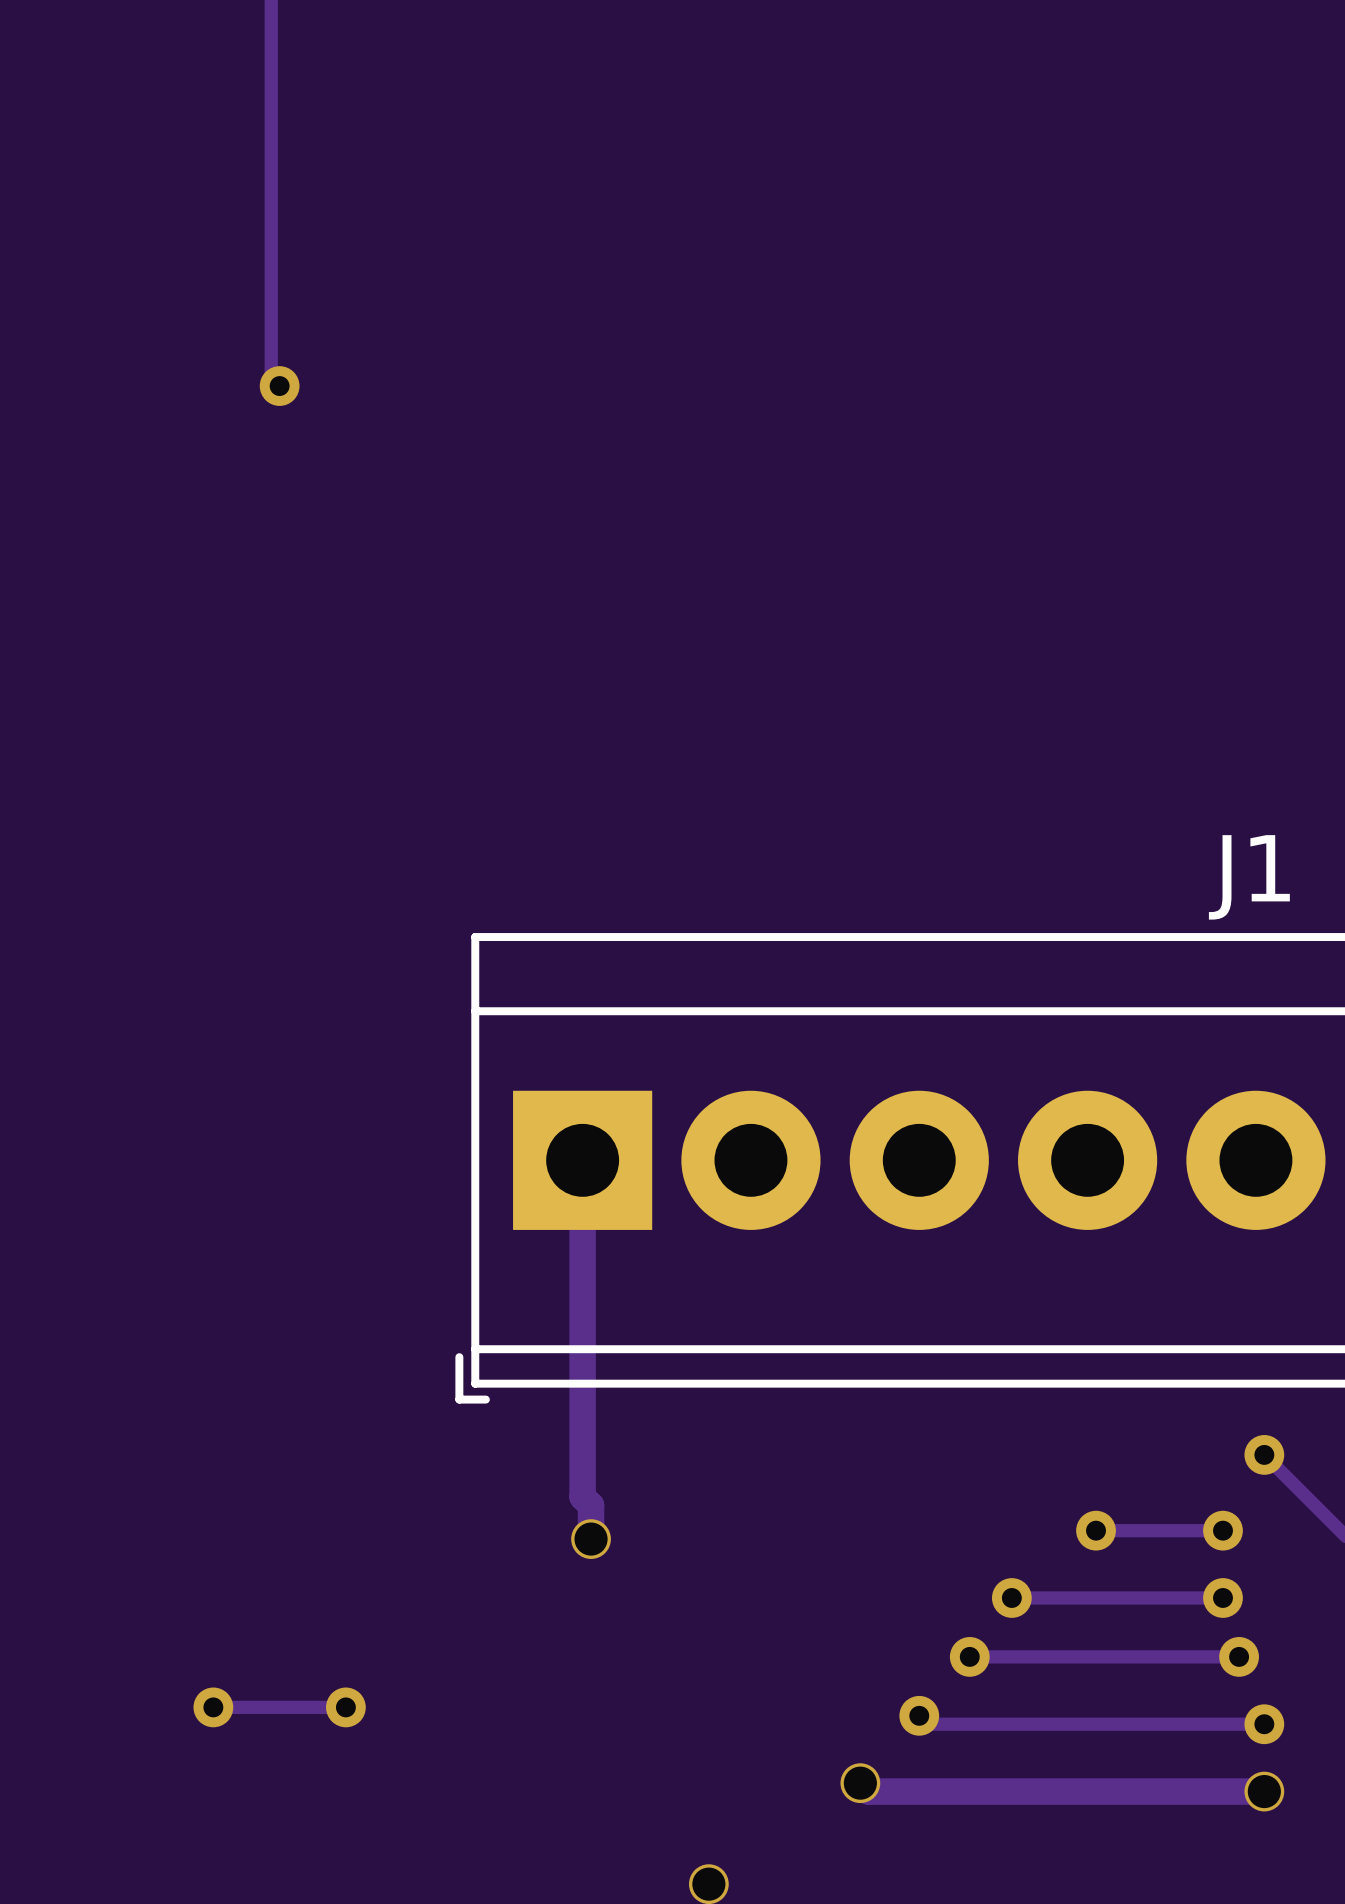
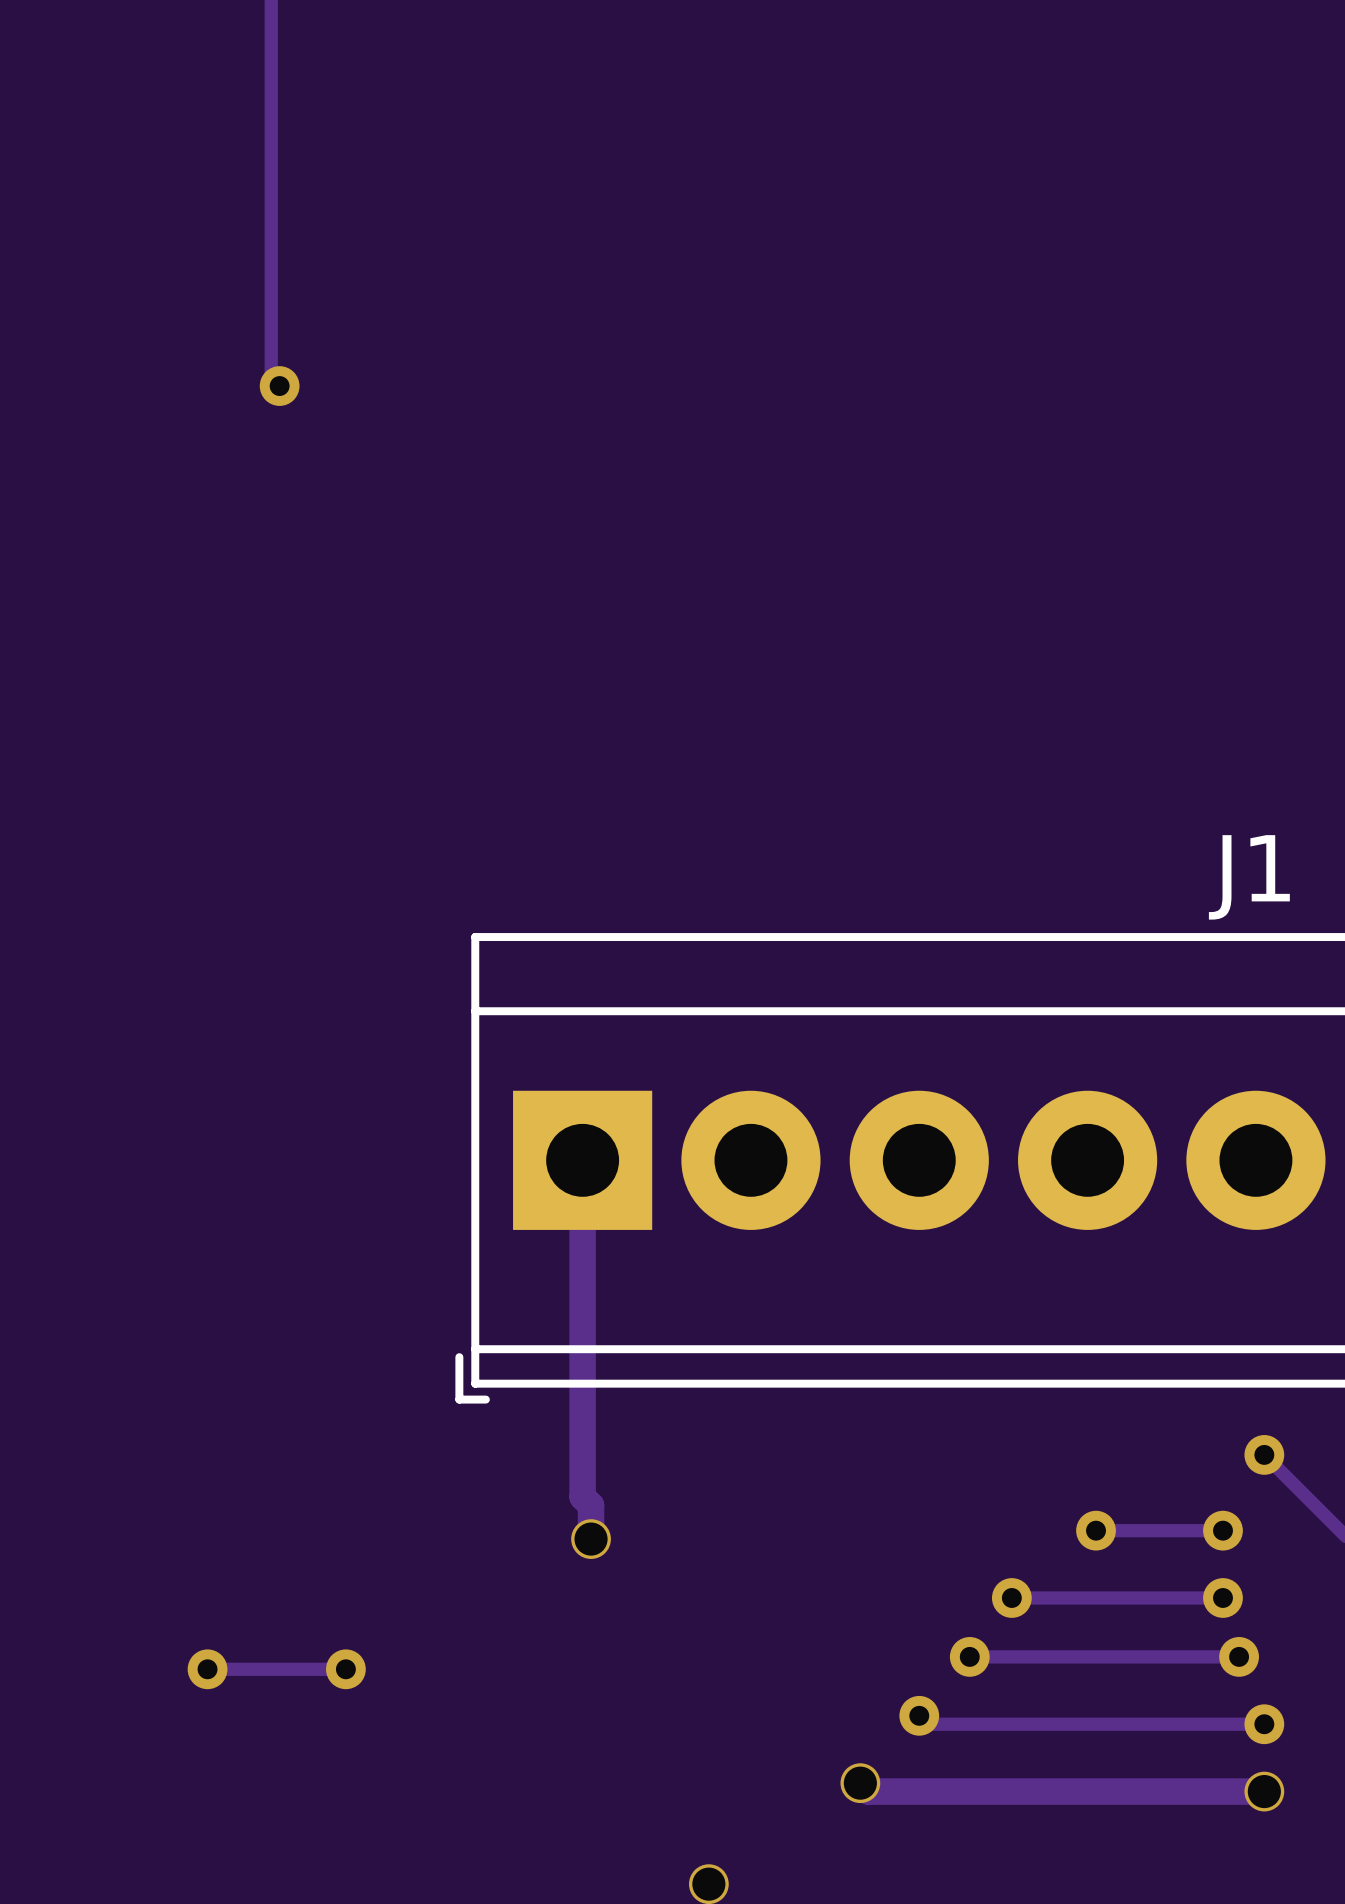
track: none -> (345, 1669) (207, 1669)
via position: (213, 1707) -> (207, 1669)
track: (345, 1707) (213, 1707) -> none
via position: (345, 1707) -> (345, 1669)

